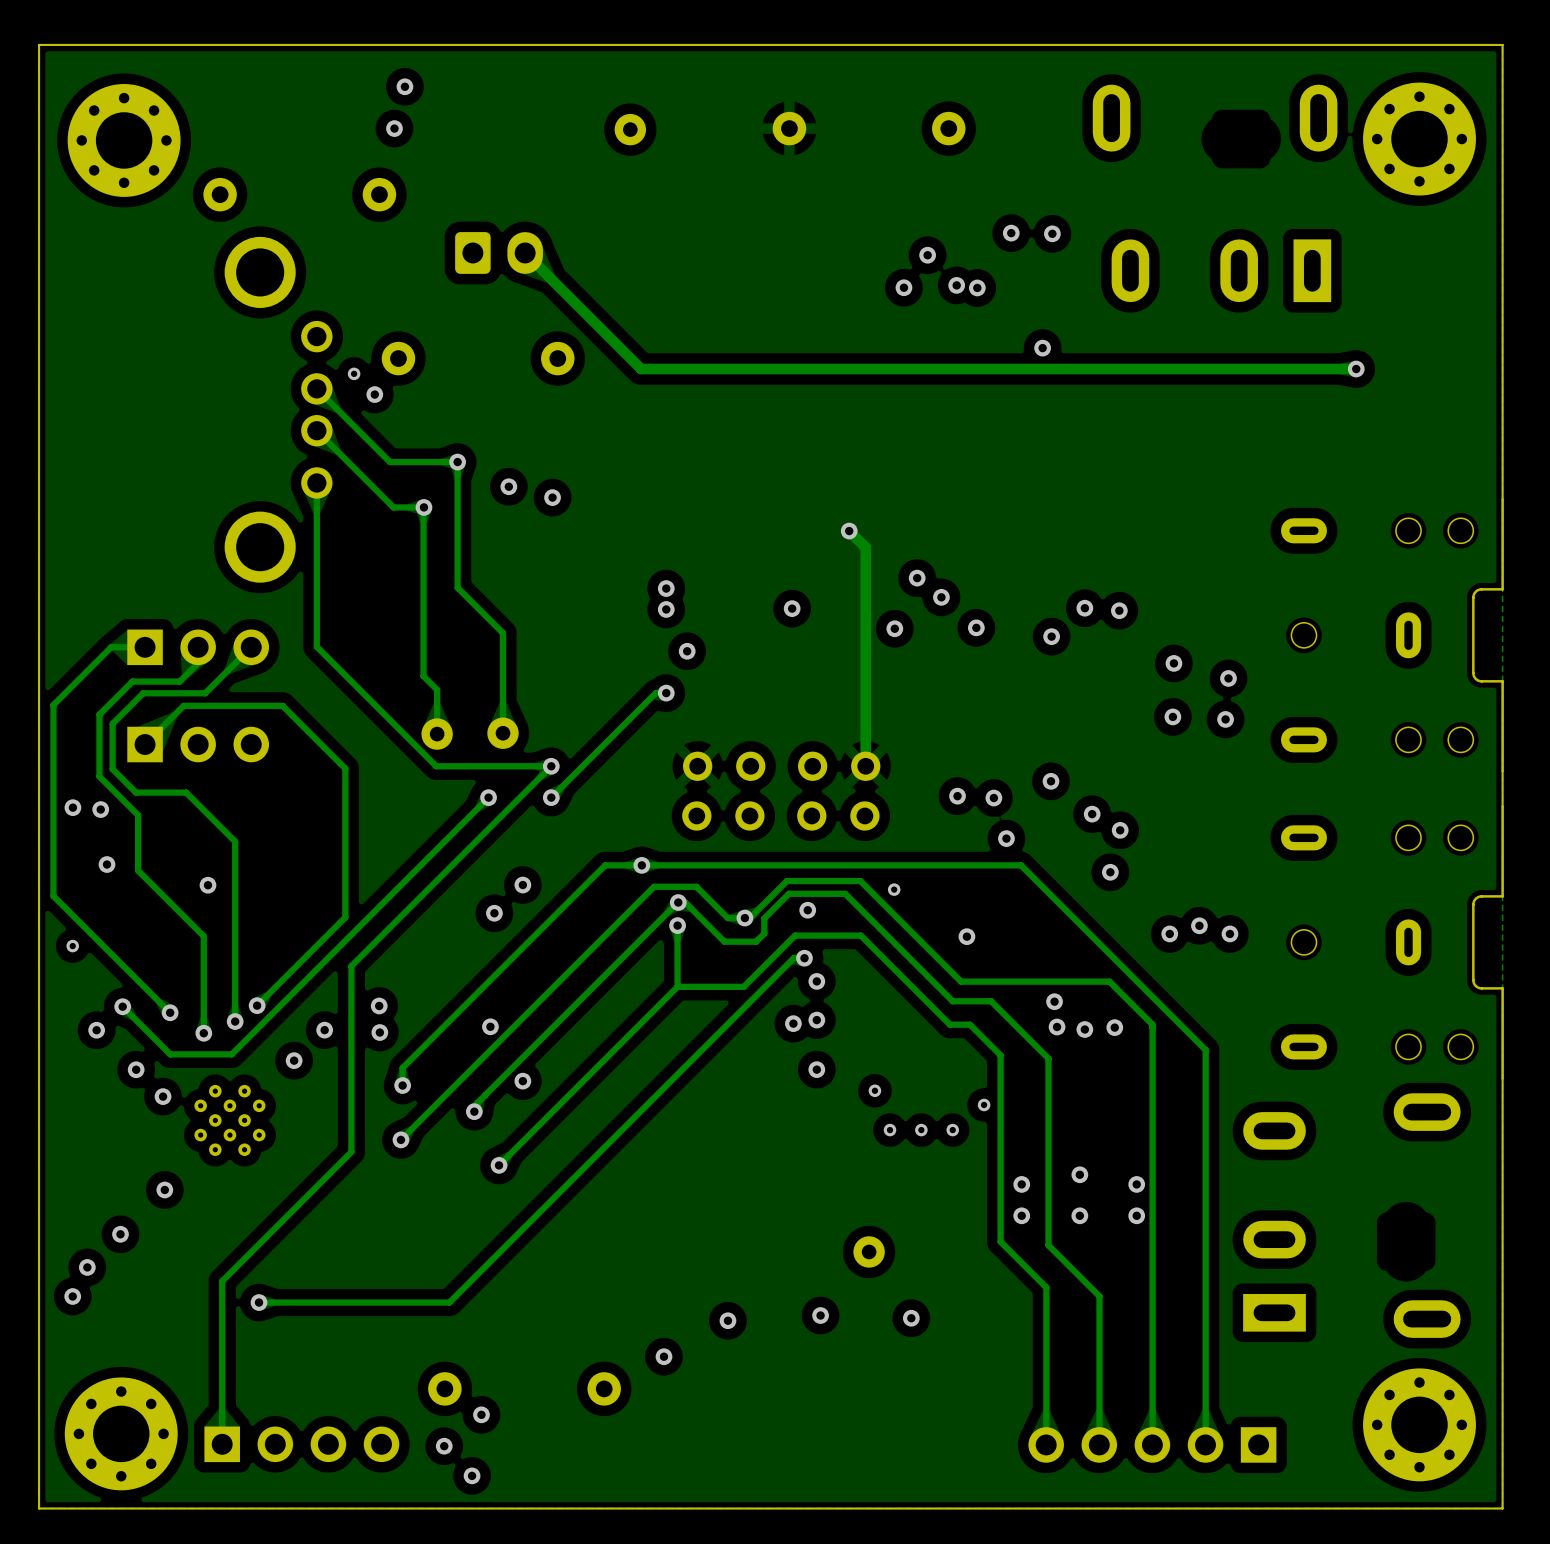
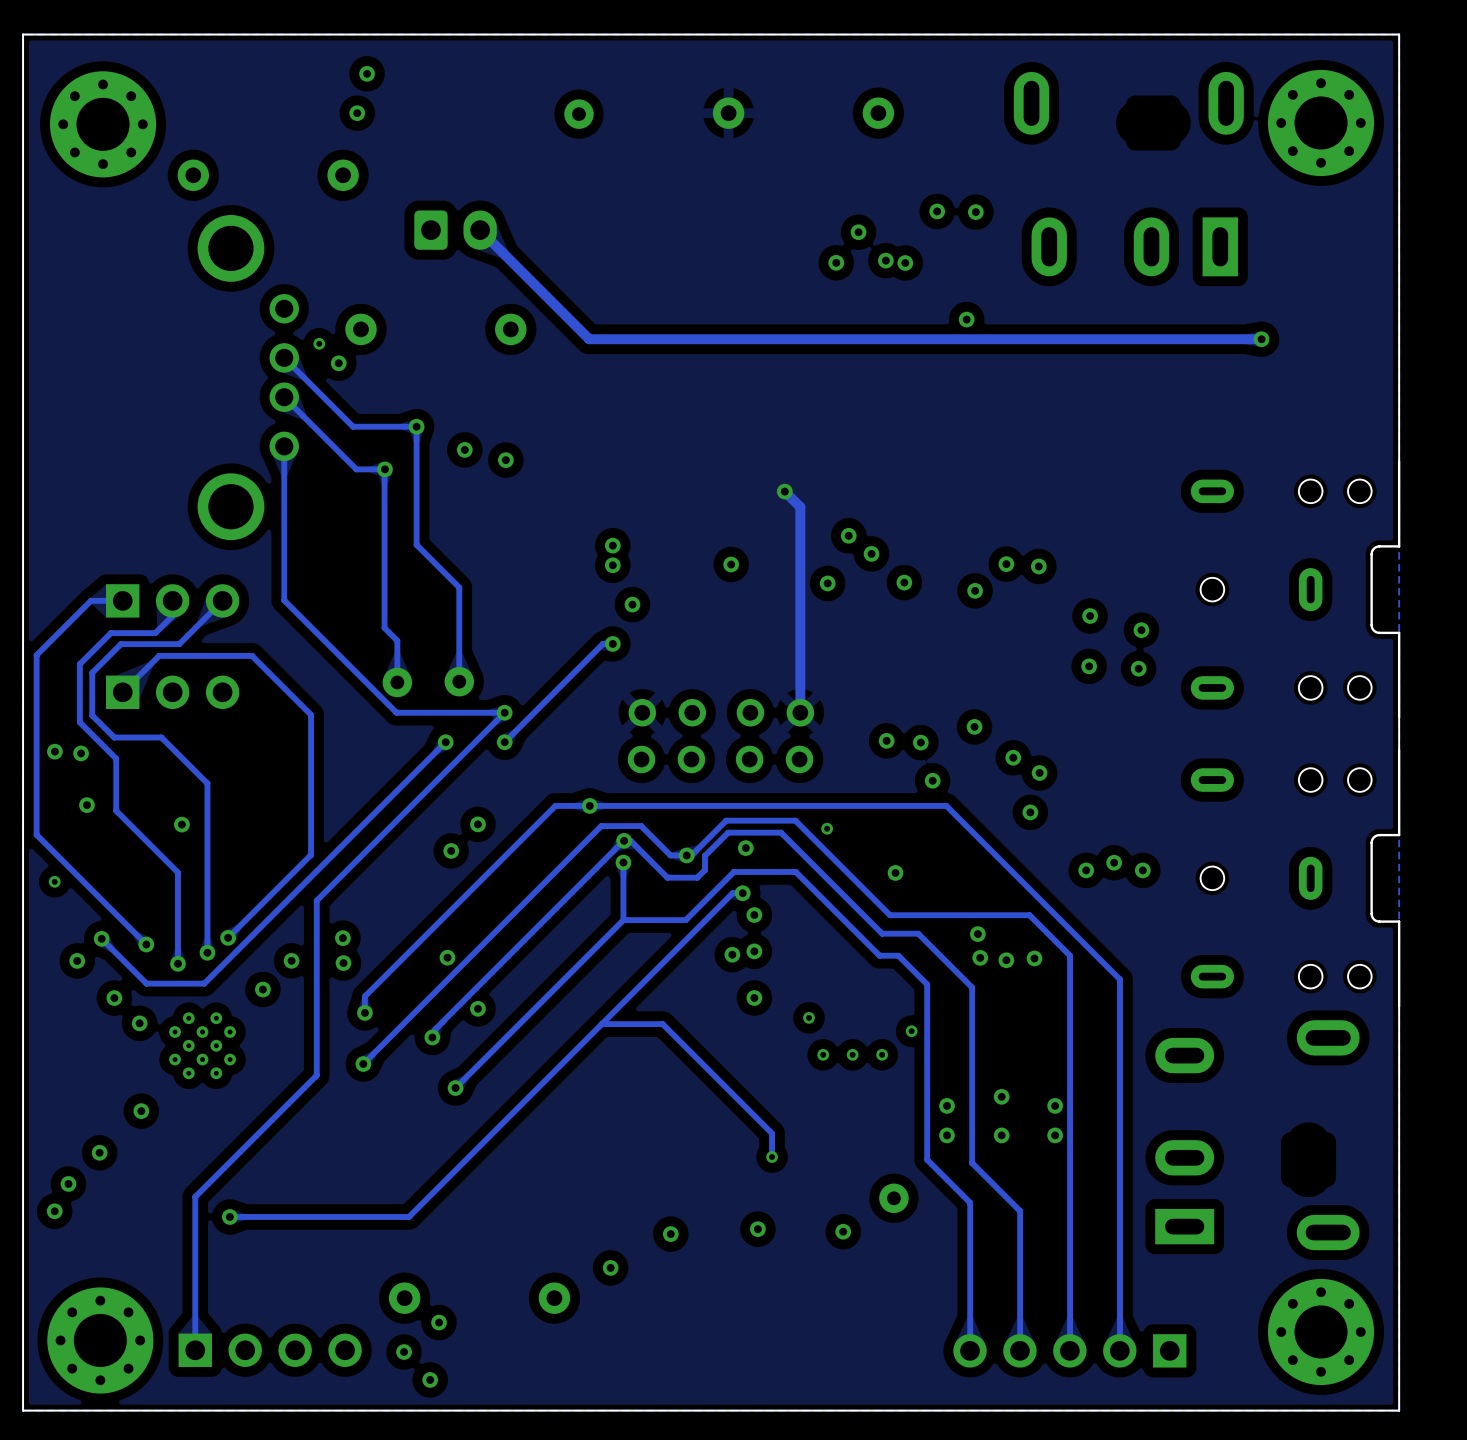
track: none -> (601, 1024) (662, 1024) (772, 1133) (772, 1157)
via: none -> (772, 1157)
part position: (869, 1251) -> (893, 1198)

